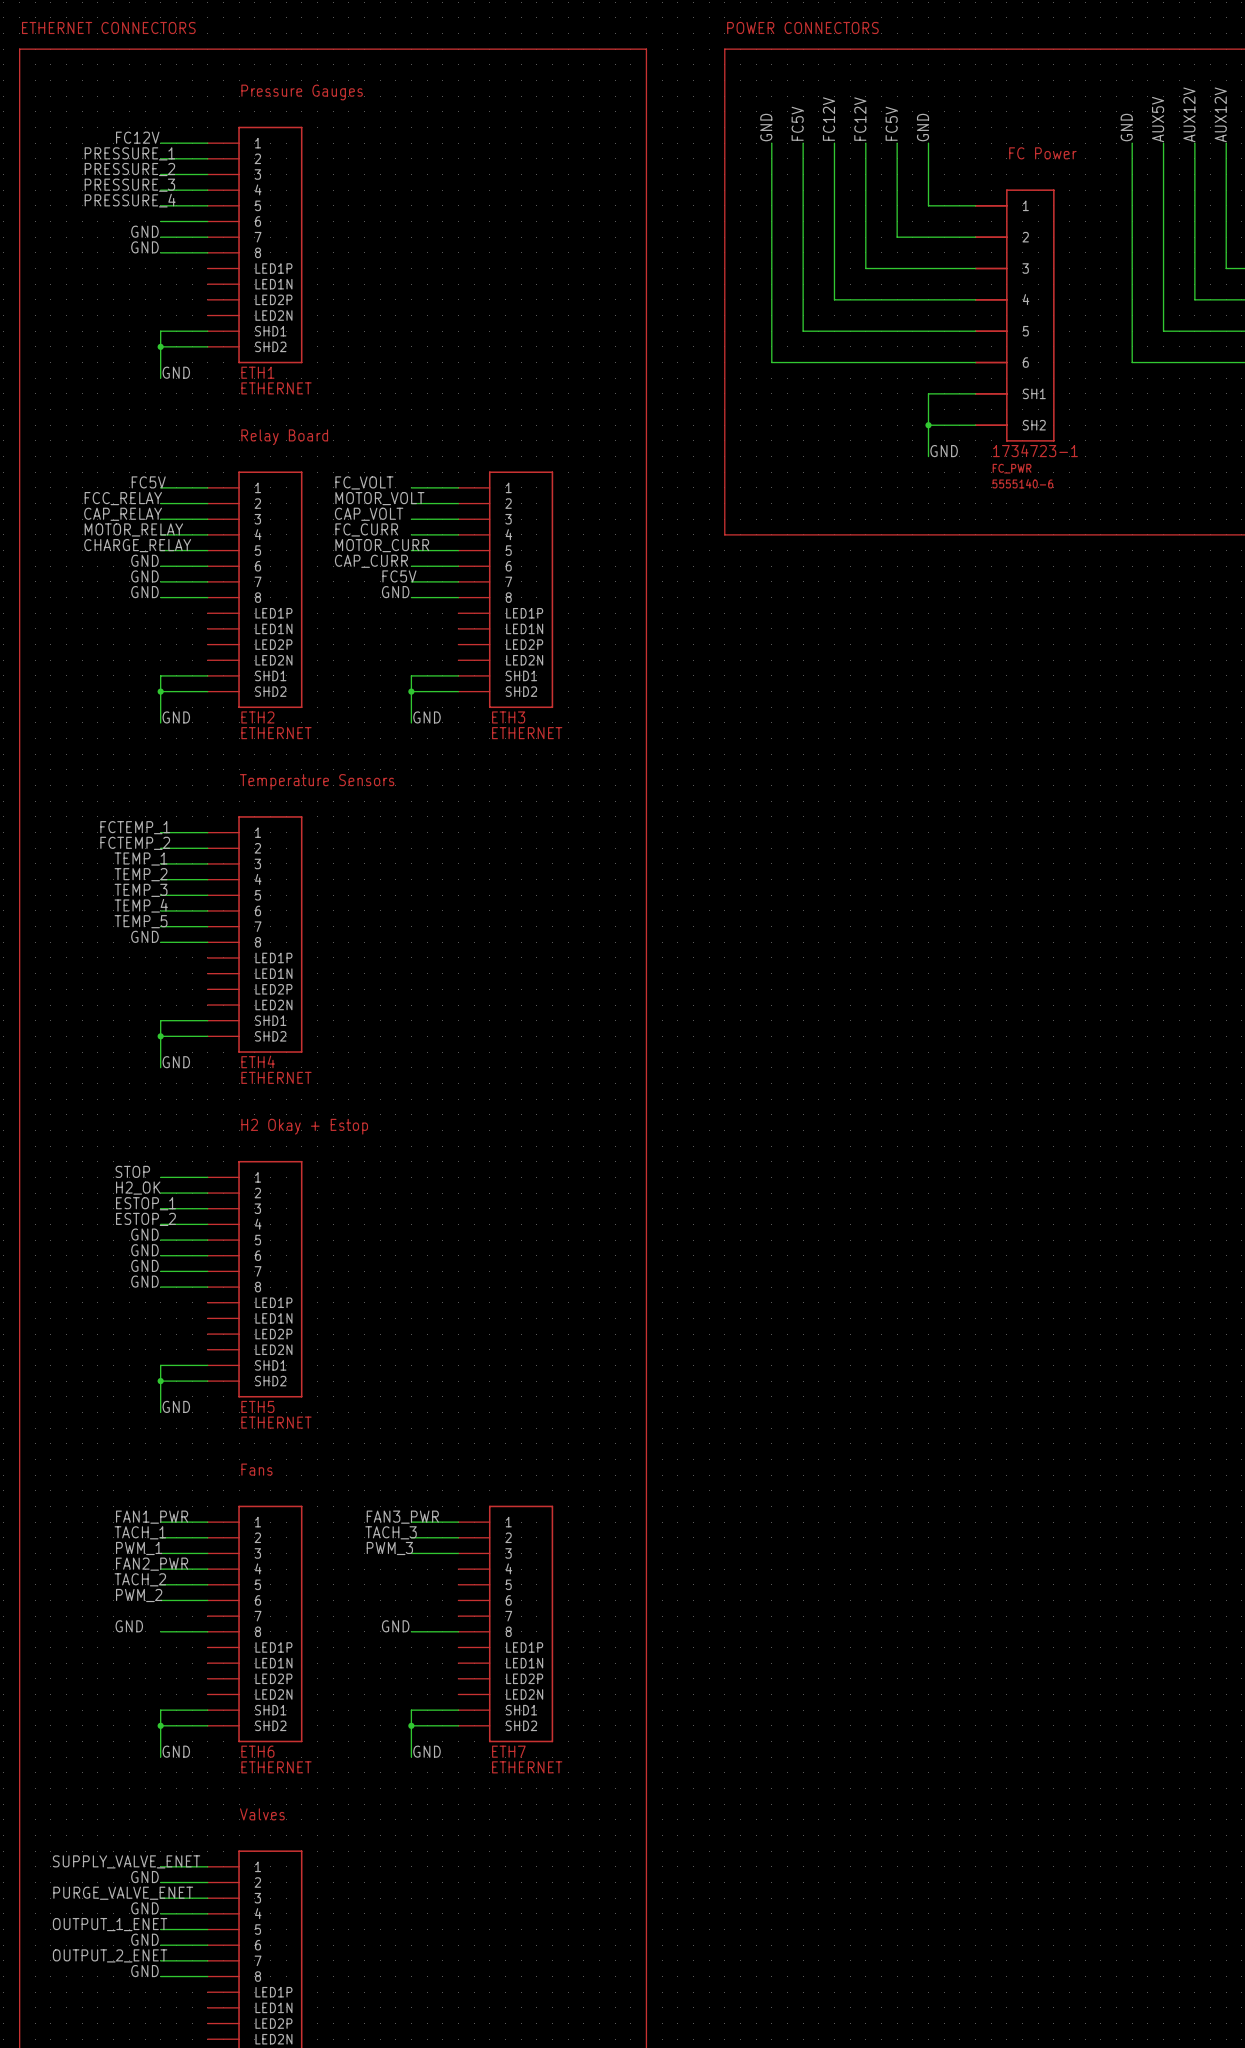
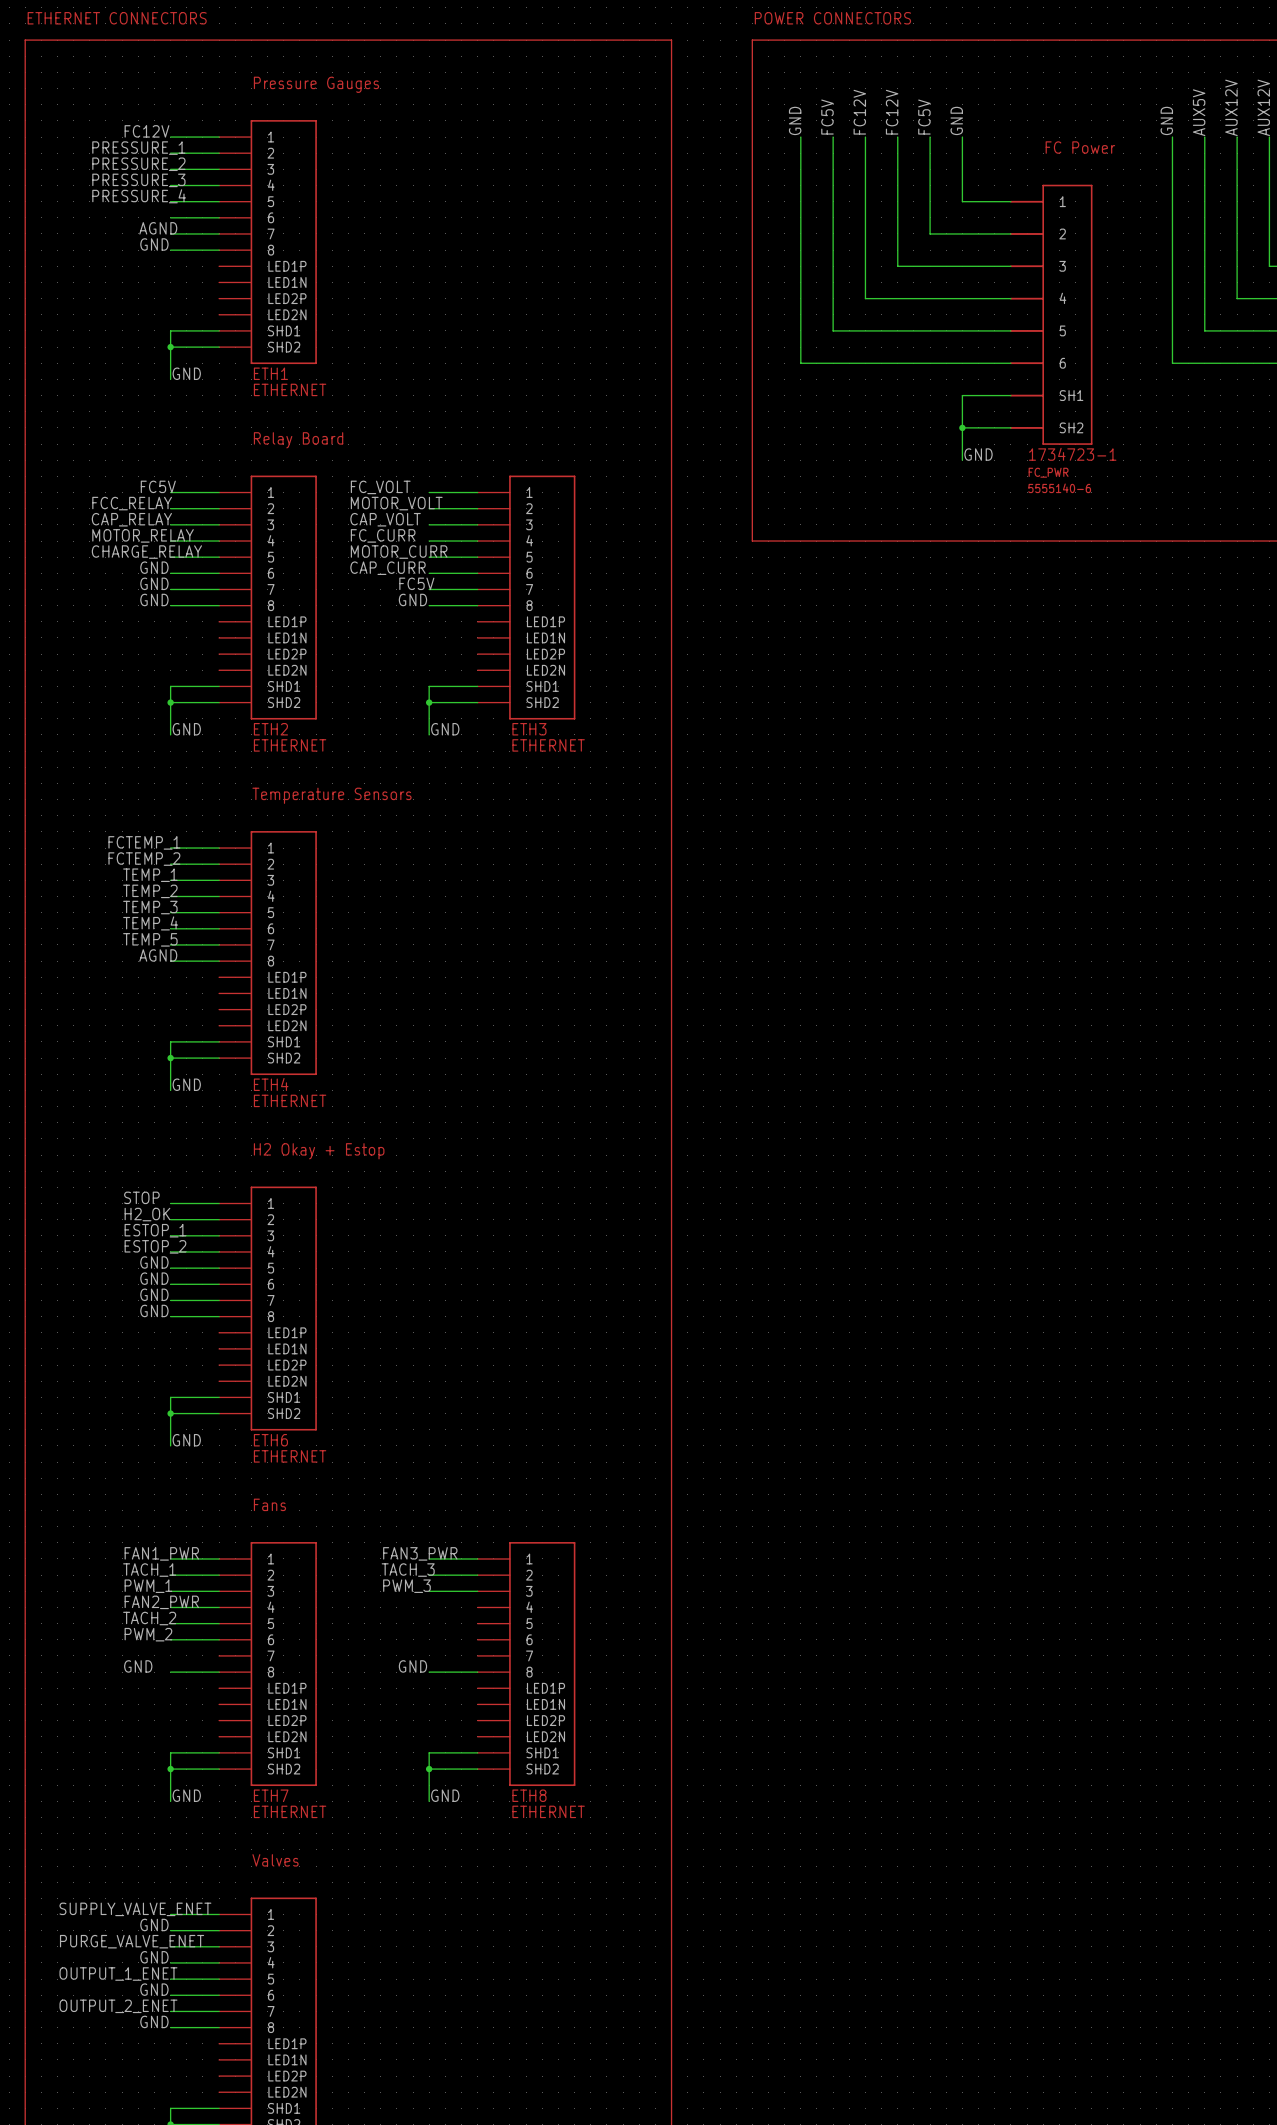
label: GND (144, 231) -> AGND (158, 228)
label: GND (144, 936) -> AGND (158, 955)
ETH5 name: ETH5 (257, 1406) -> ETH6 (270, 1440)
ETH6 name: ETH6 (257, 1751) -> ETH7 (271, 1795)
ETH7 name: ETH7 (508, 1751) -> ETH8 (529, 1795)

